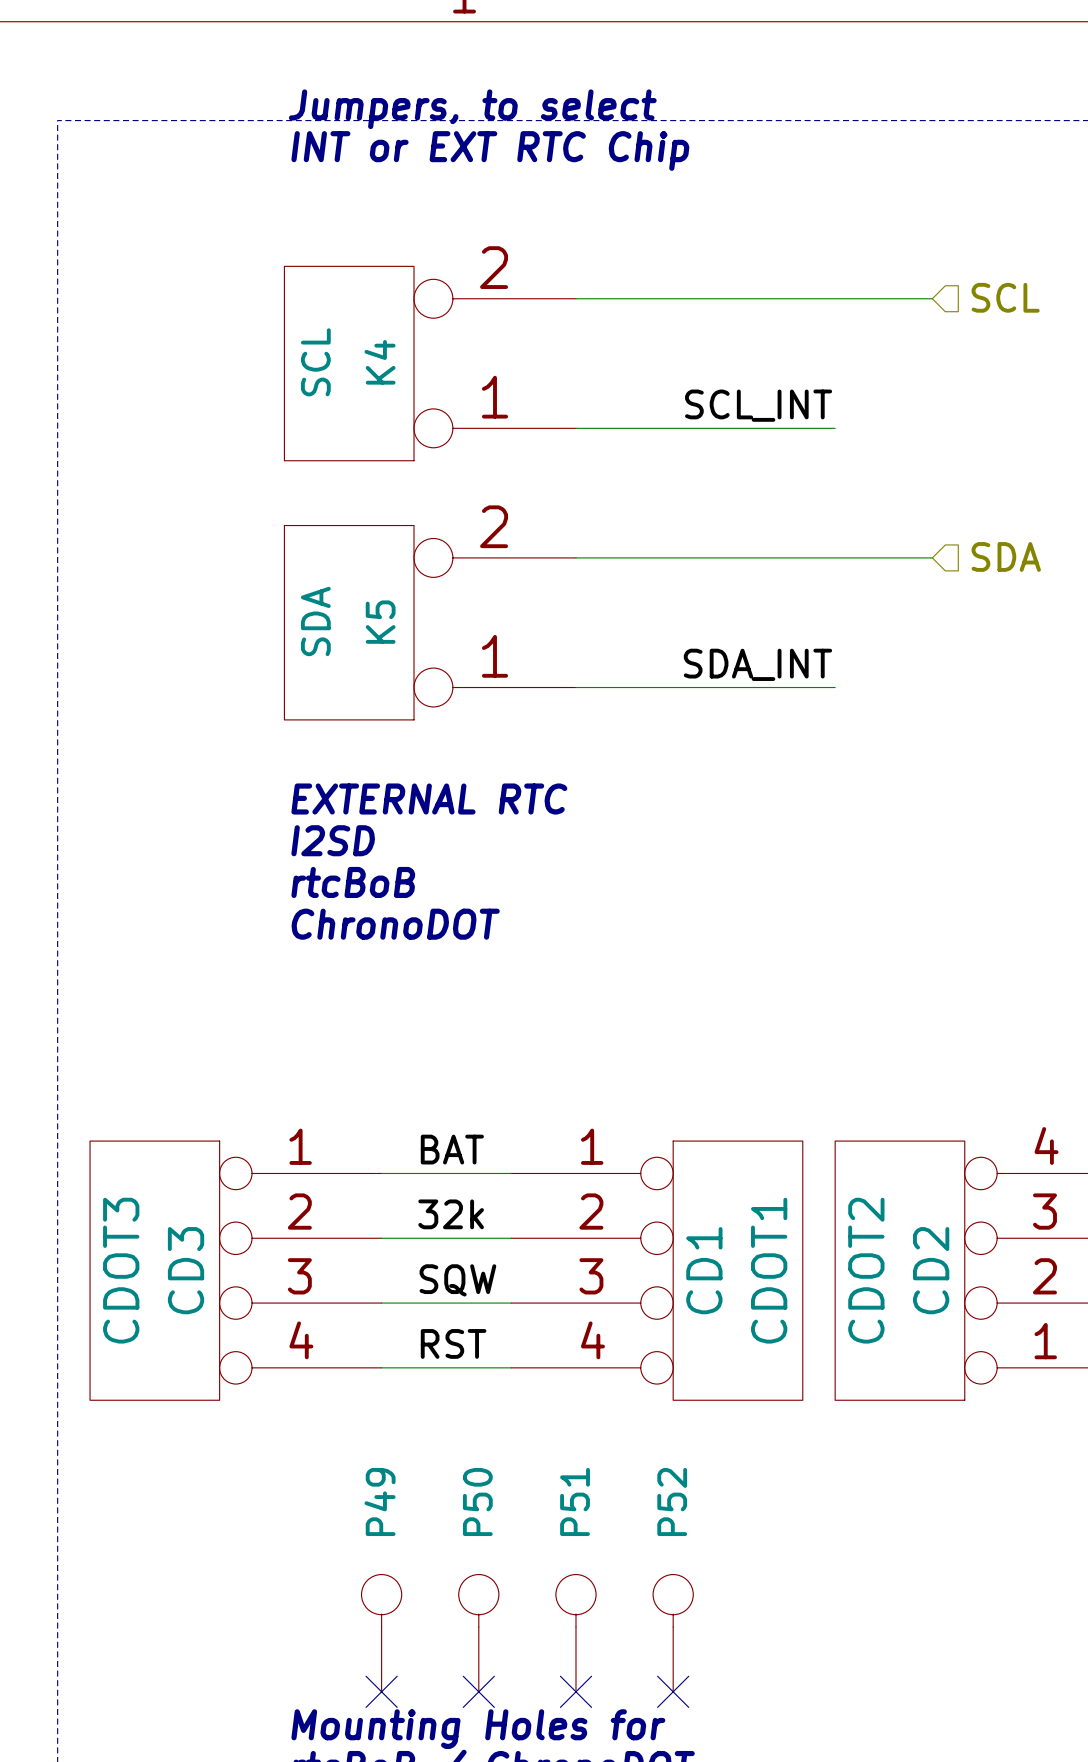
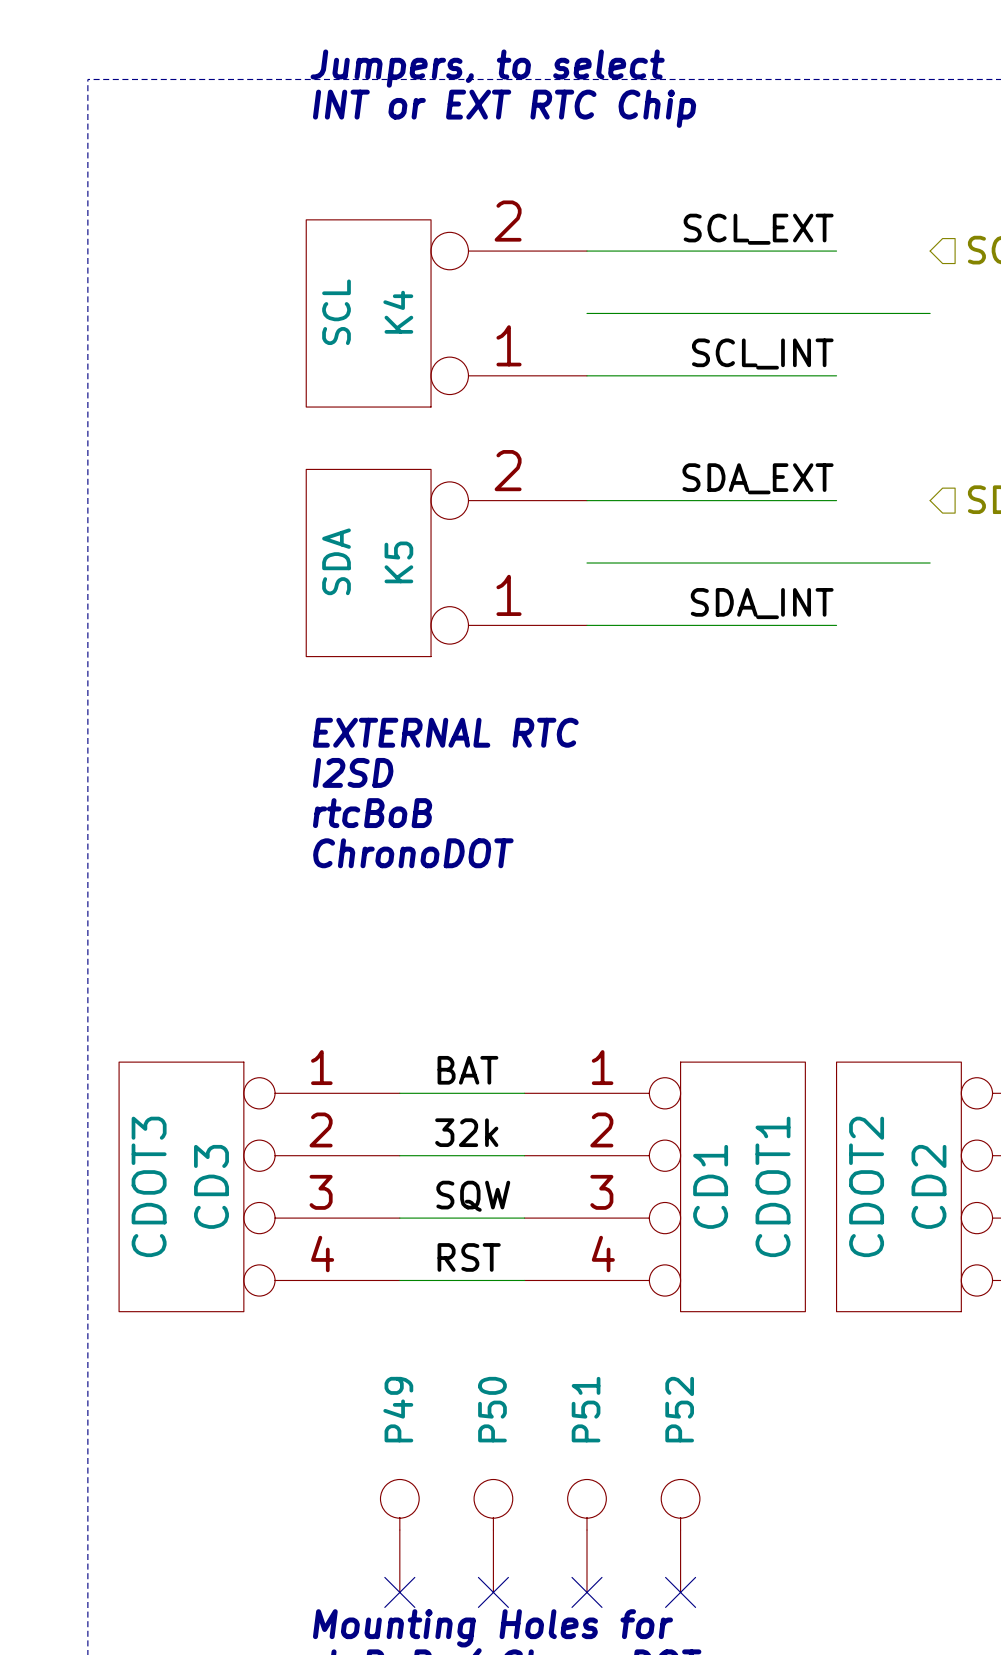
label: none -> SCL_EXT (758, 229)
wire: (835, 298) (932, 298) -> none
wire: none -> (586, 313) (930, 313)
label: none -> SDA_EXT (758, 478)
wire: (835, 557) (932, 557) -> none
wire: none -> (586, 563) (930, 563)

